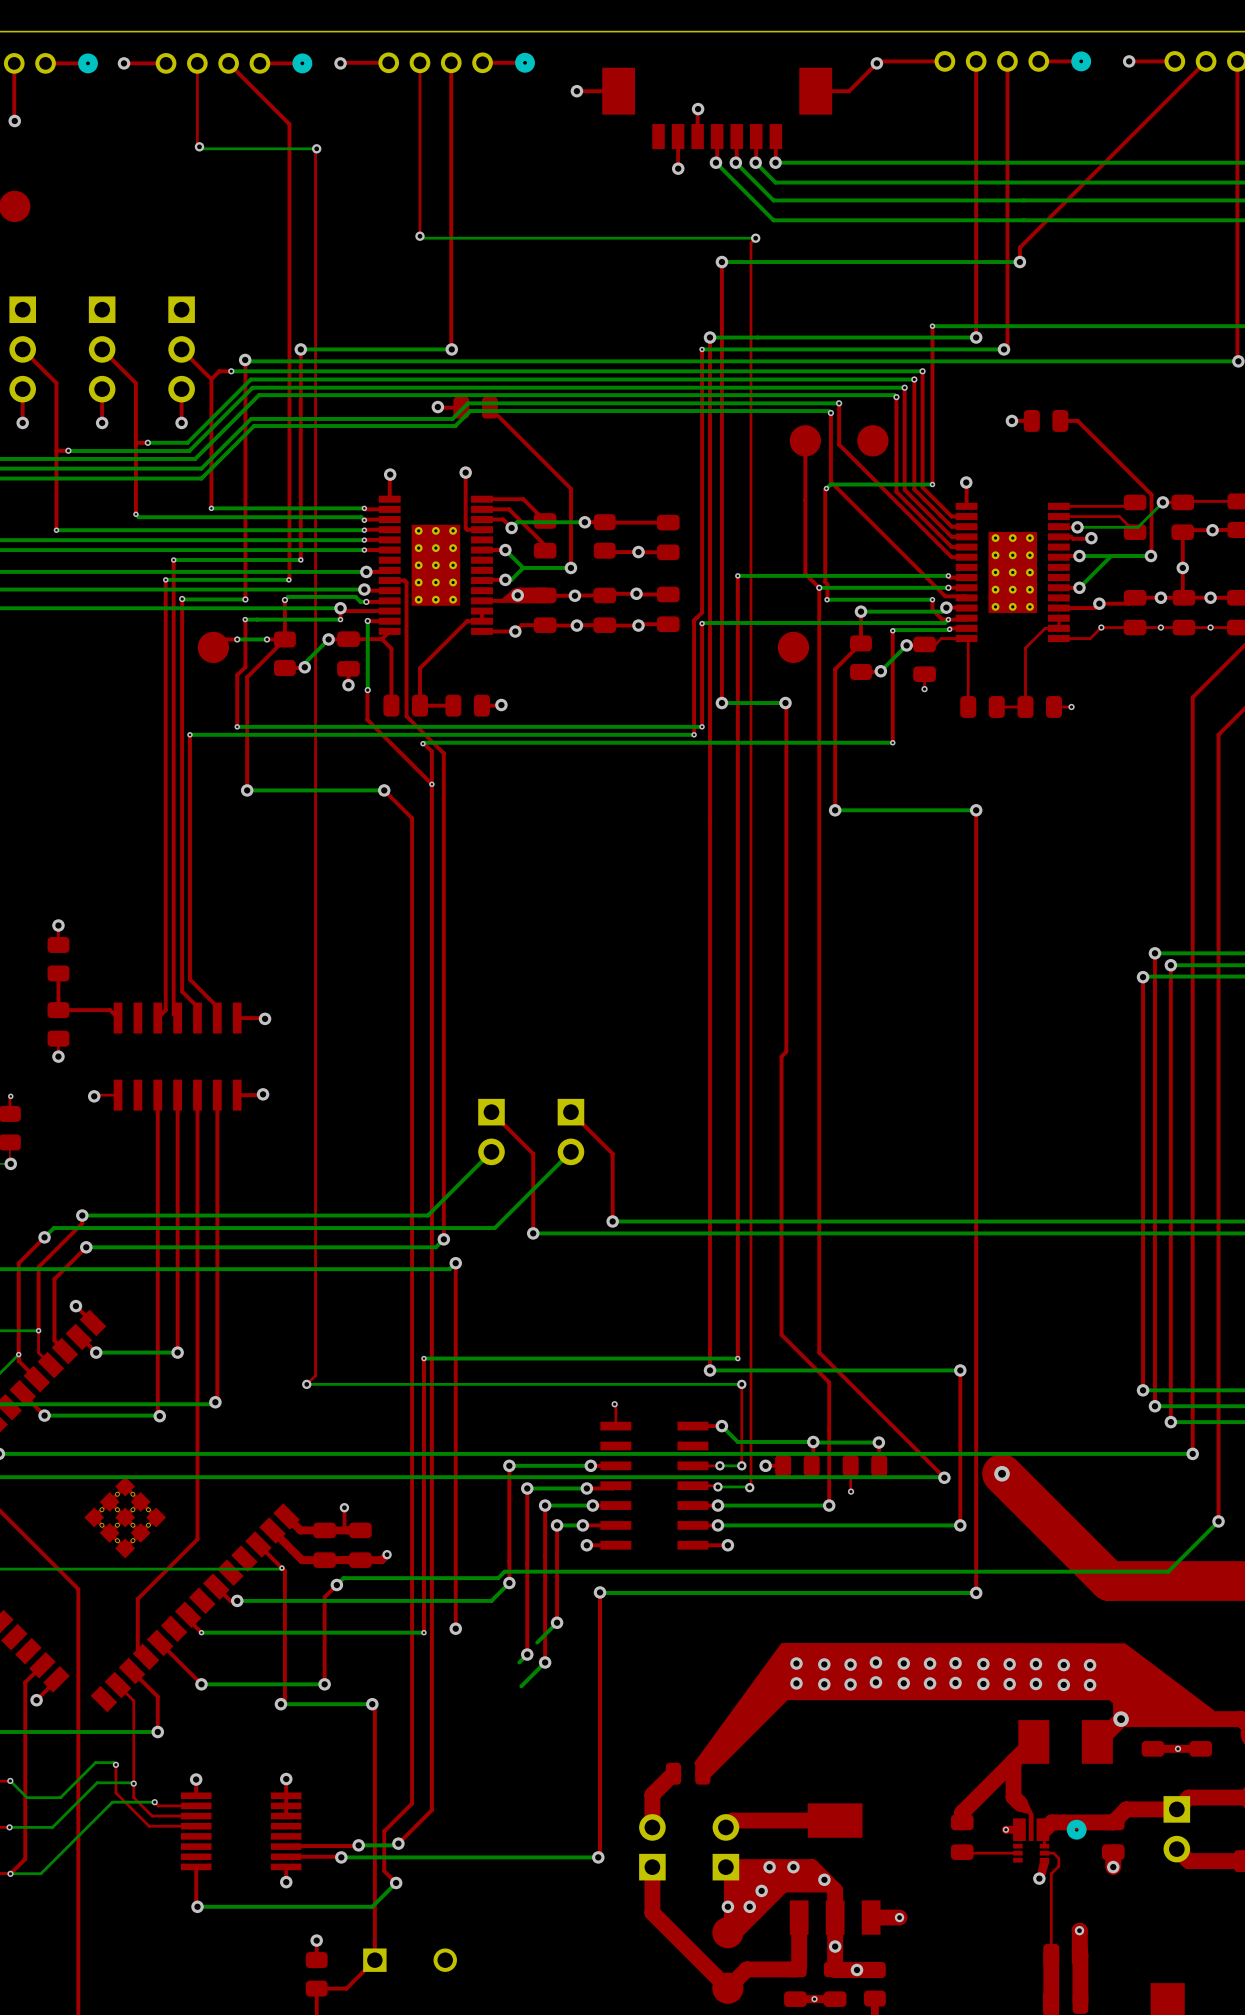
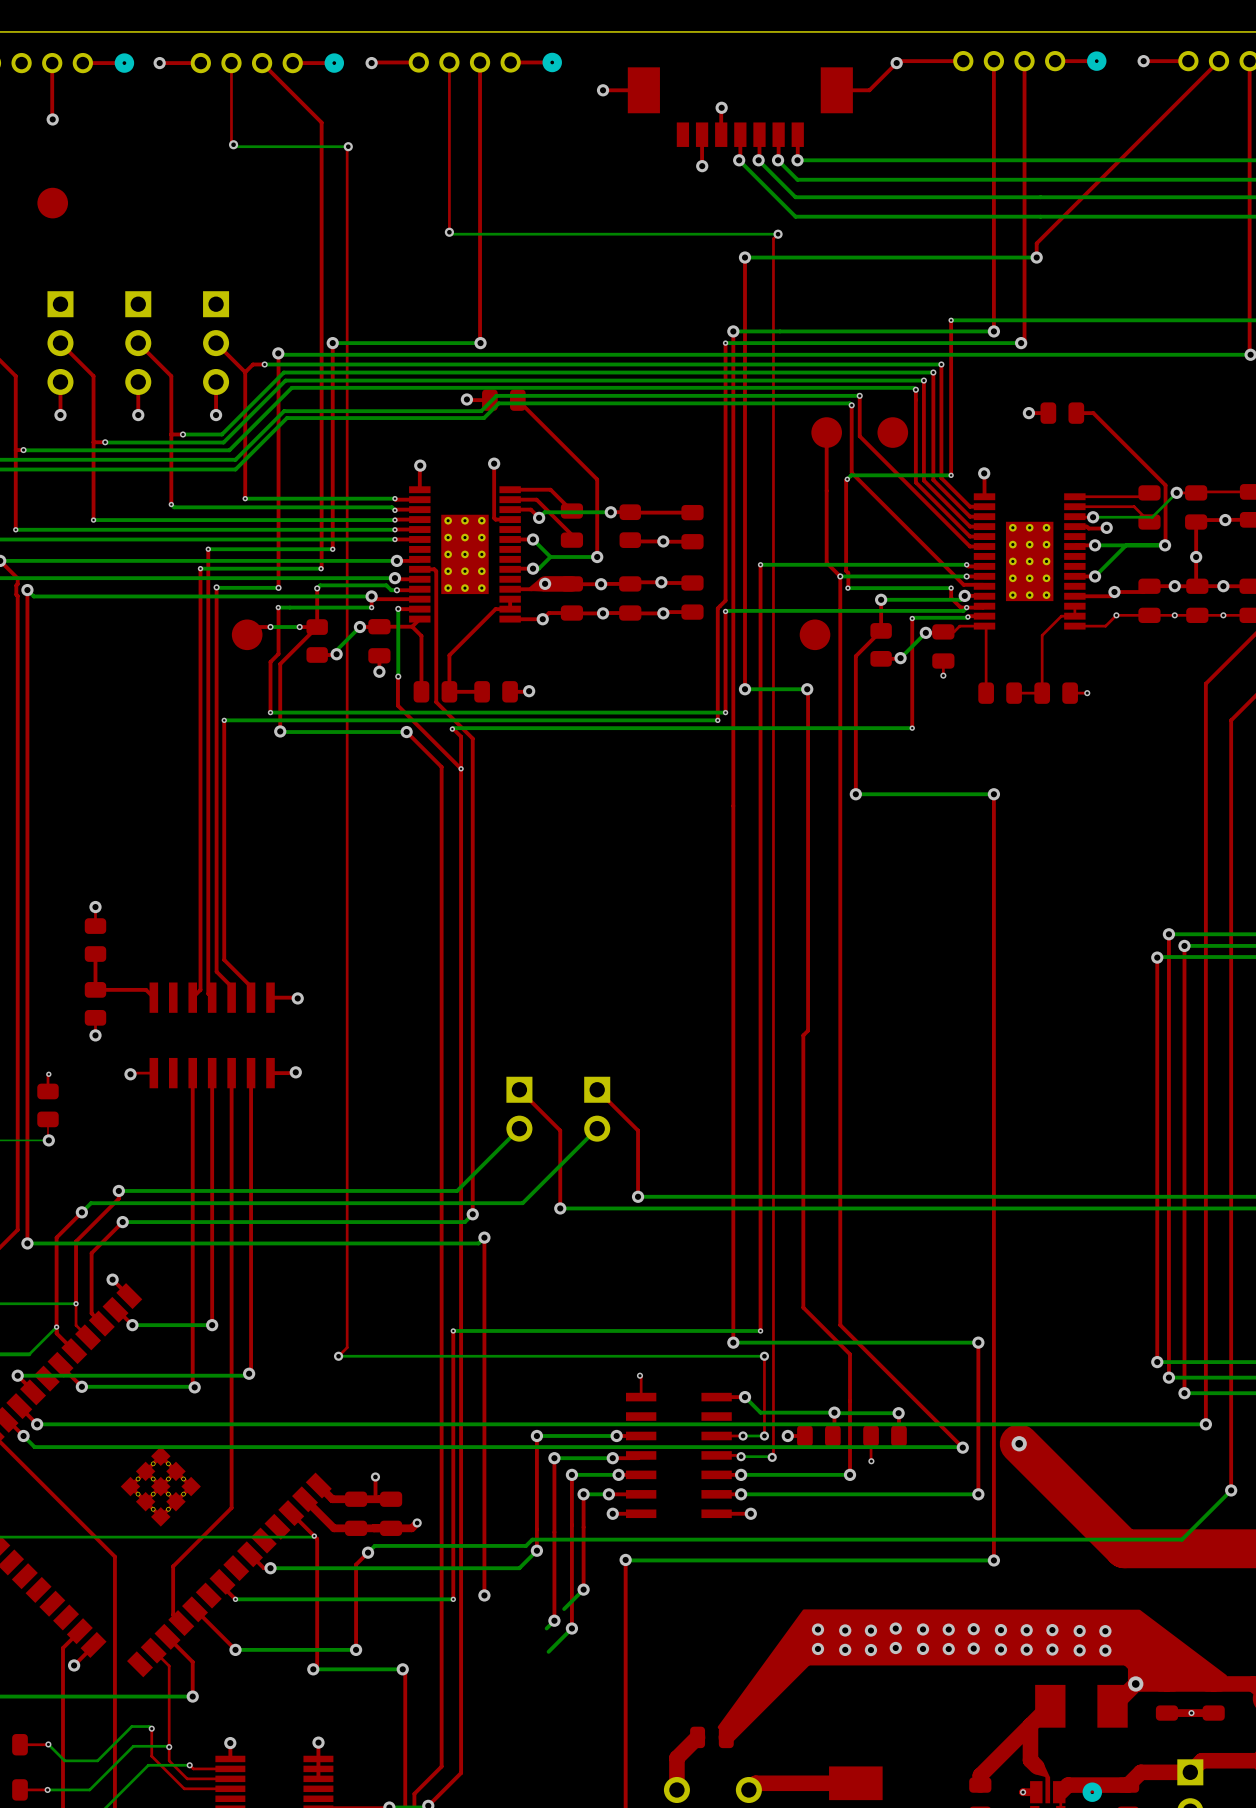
top track: (247, 746) (247, 790) -> none
bottom track: none -> (280, 731) (406, 732)
via position: (247, 790) -> (280, 731)
top track: (384, 790) (412, 818) -> (406, 732) (441, 767) (441, 802)
bottom track: (384, 790) (247, 790) -> none
via position: (384, 790) -> (406, 732)

